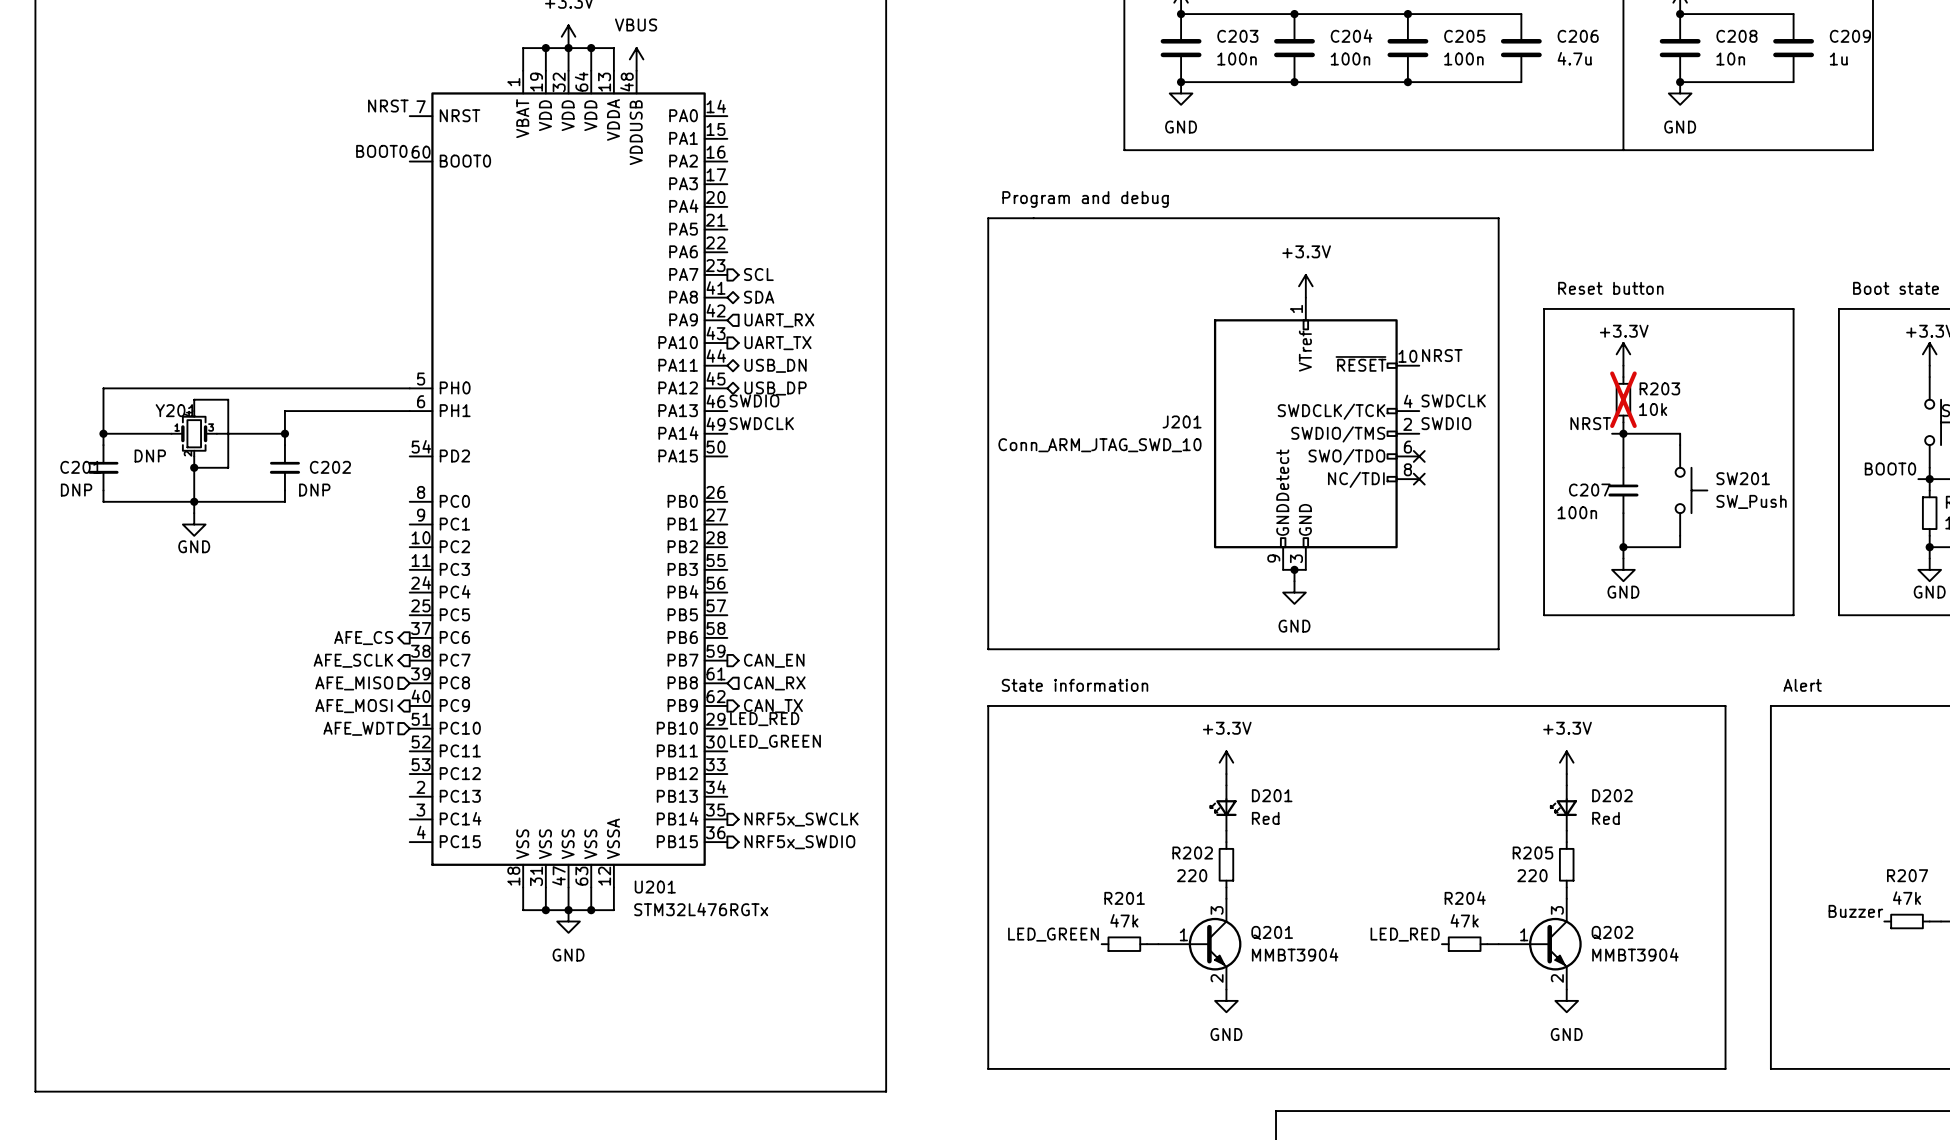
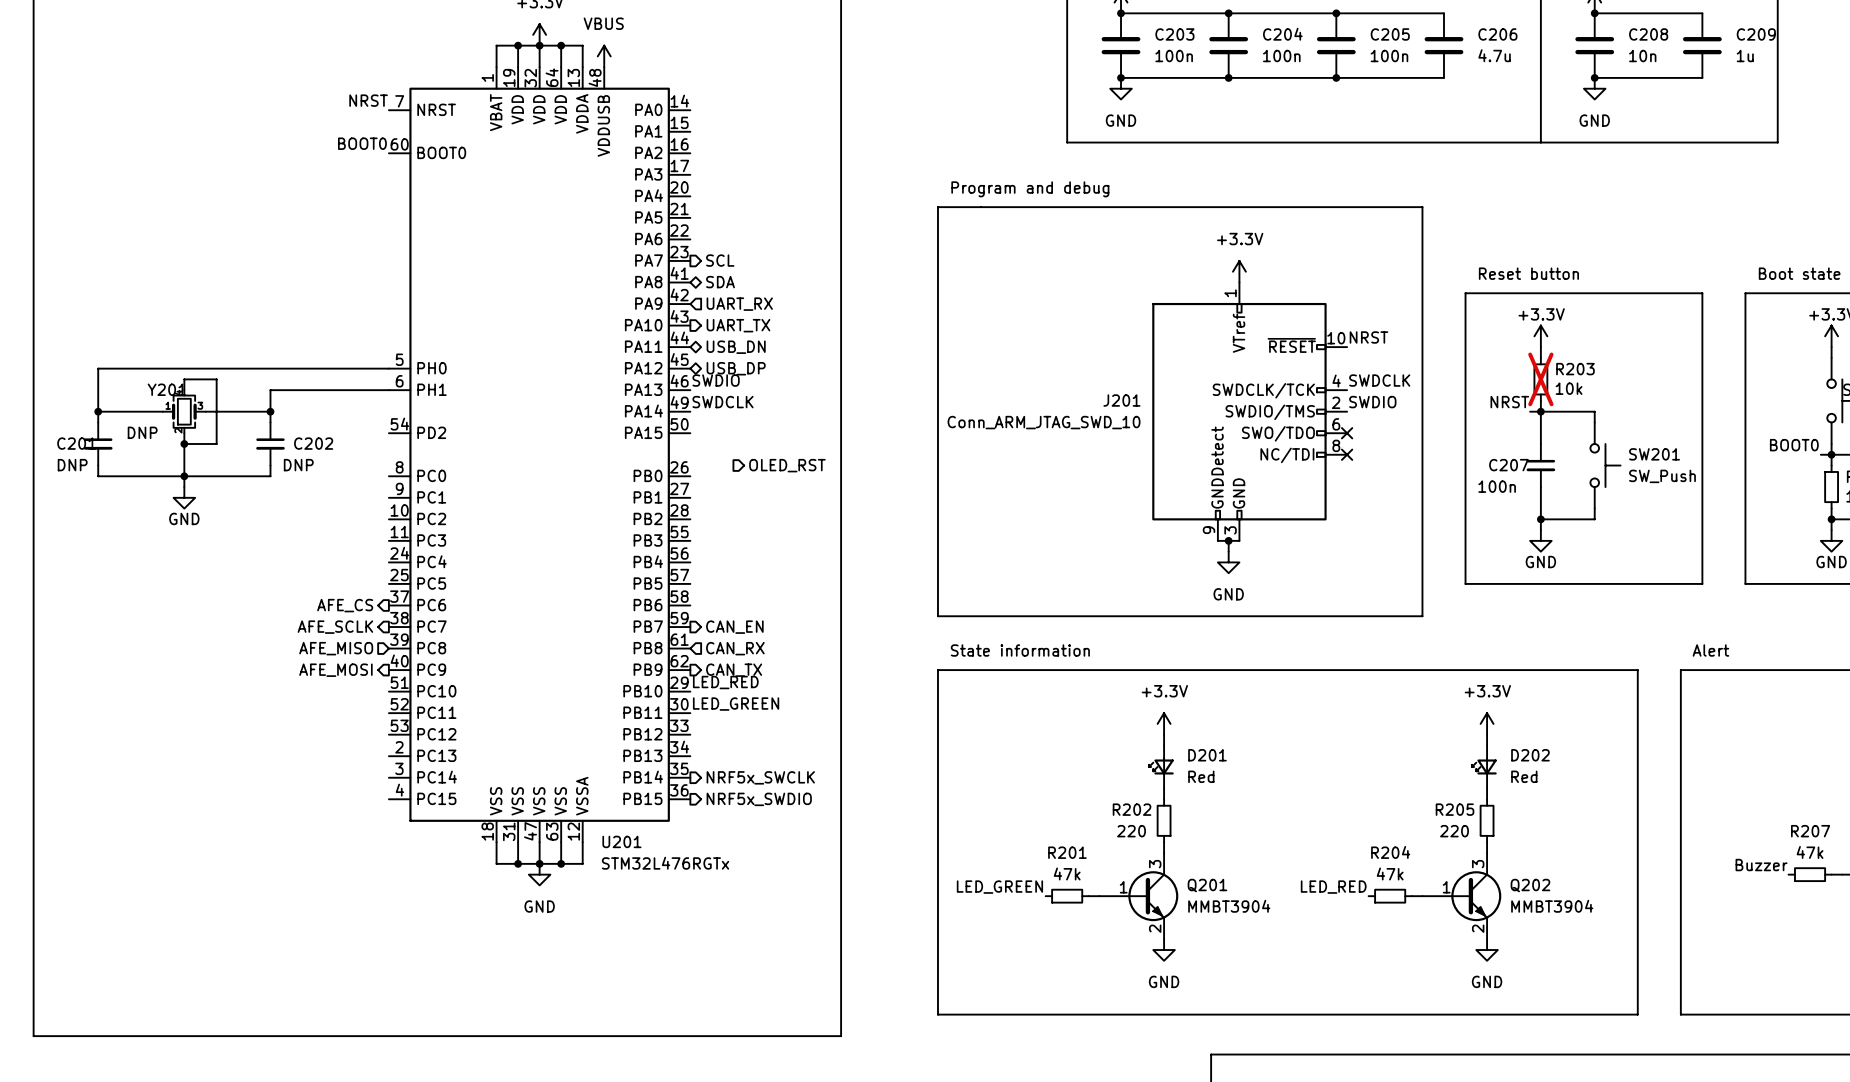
hierarchical label: none -> OLED_RST (787, 465)
hierarchical label: AFE_WDT (358, 728) -> none

